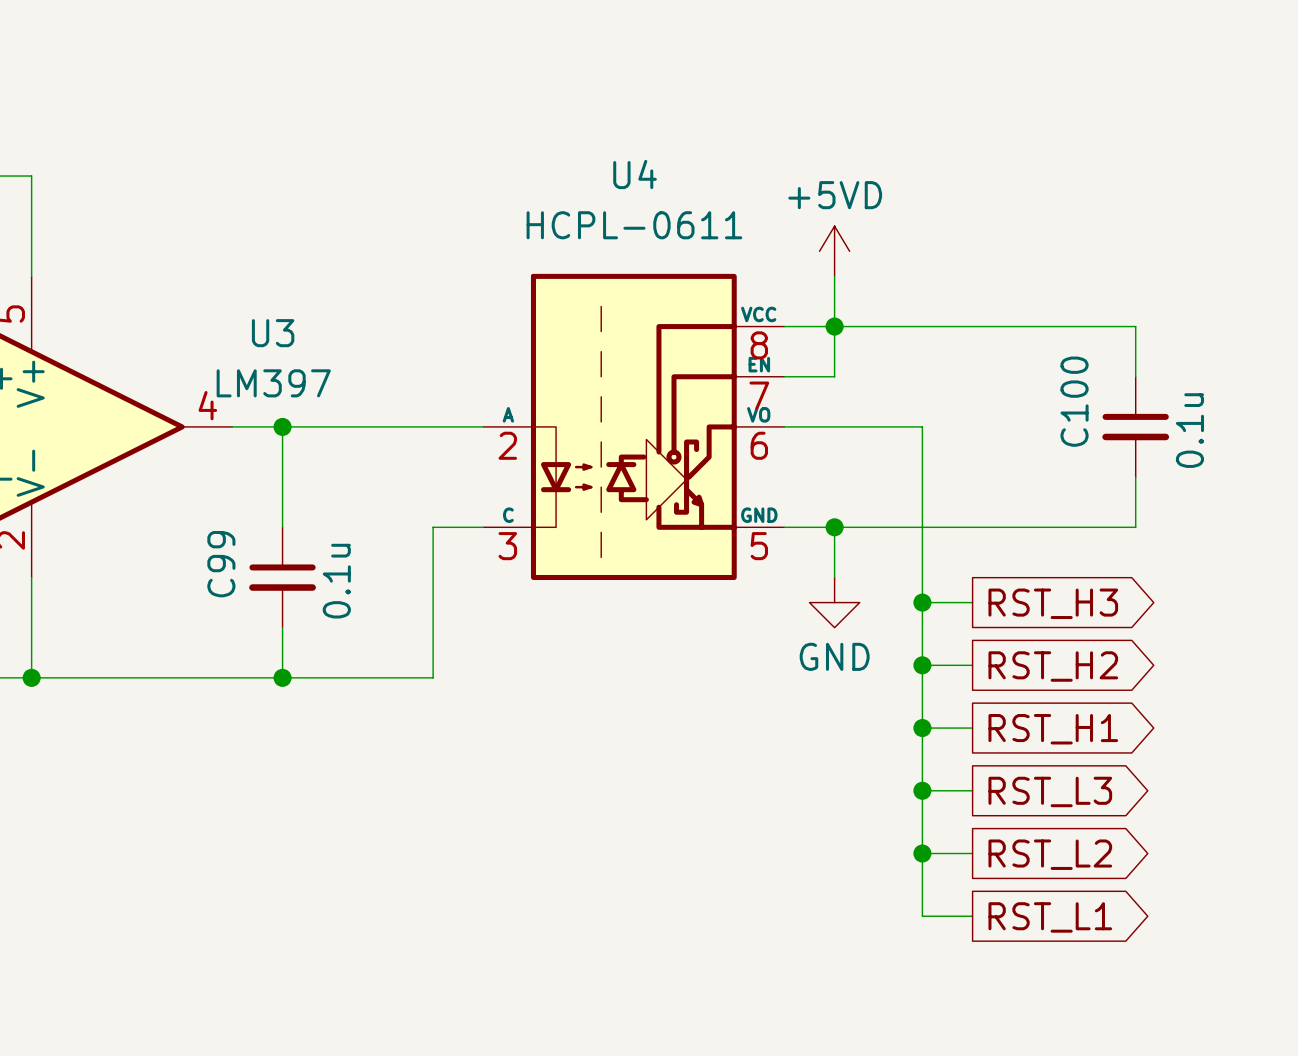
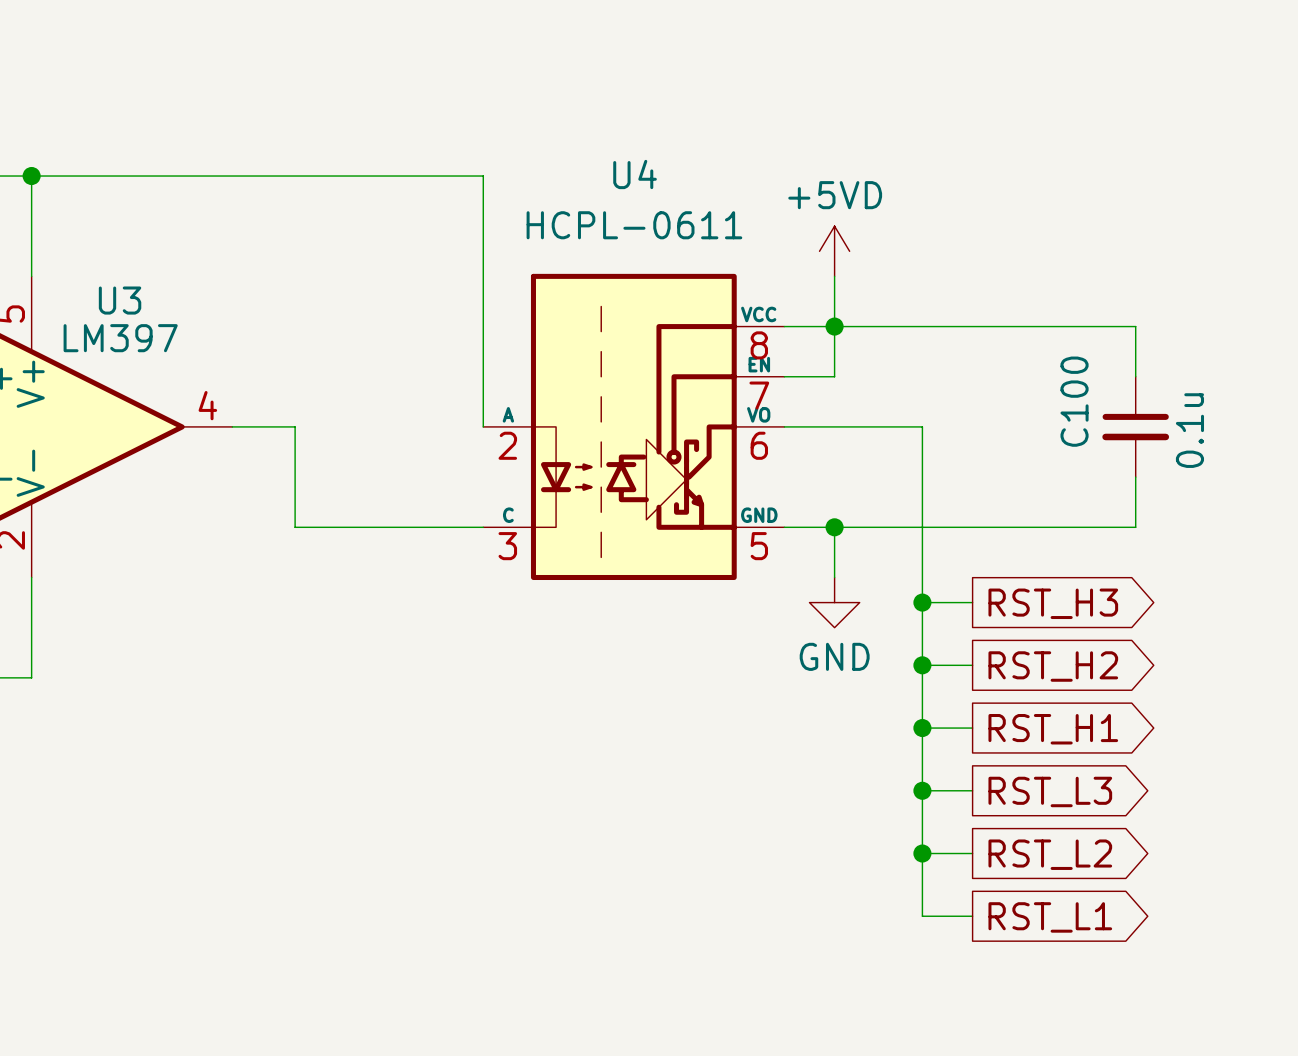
wire: none -> (31, 176) (483, 176) (483, 426)
junction: none -> (31, 176)
U3 name position: U3 (273, 333) -> U3 (120, 300)
U3 value position: LM397 (273, 383) -> LM397 (120, 338)
wire: (282, 426) (282, 527) -> none
junction: (282, 426) -> none
wire: (295, 426) (483, 426) -> (295, 426) (295, 527) (433, 527)
wire: (433, 527) (433, 677) (31, 677) -> none
C99: 0.1u (282, 577) -> none
wire: (282, 627) (282, 677) -> none
junction: (31, 677) -> none
junction: (282, 677) -> none

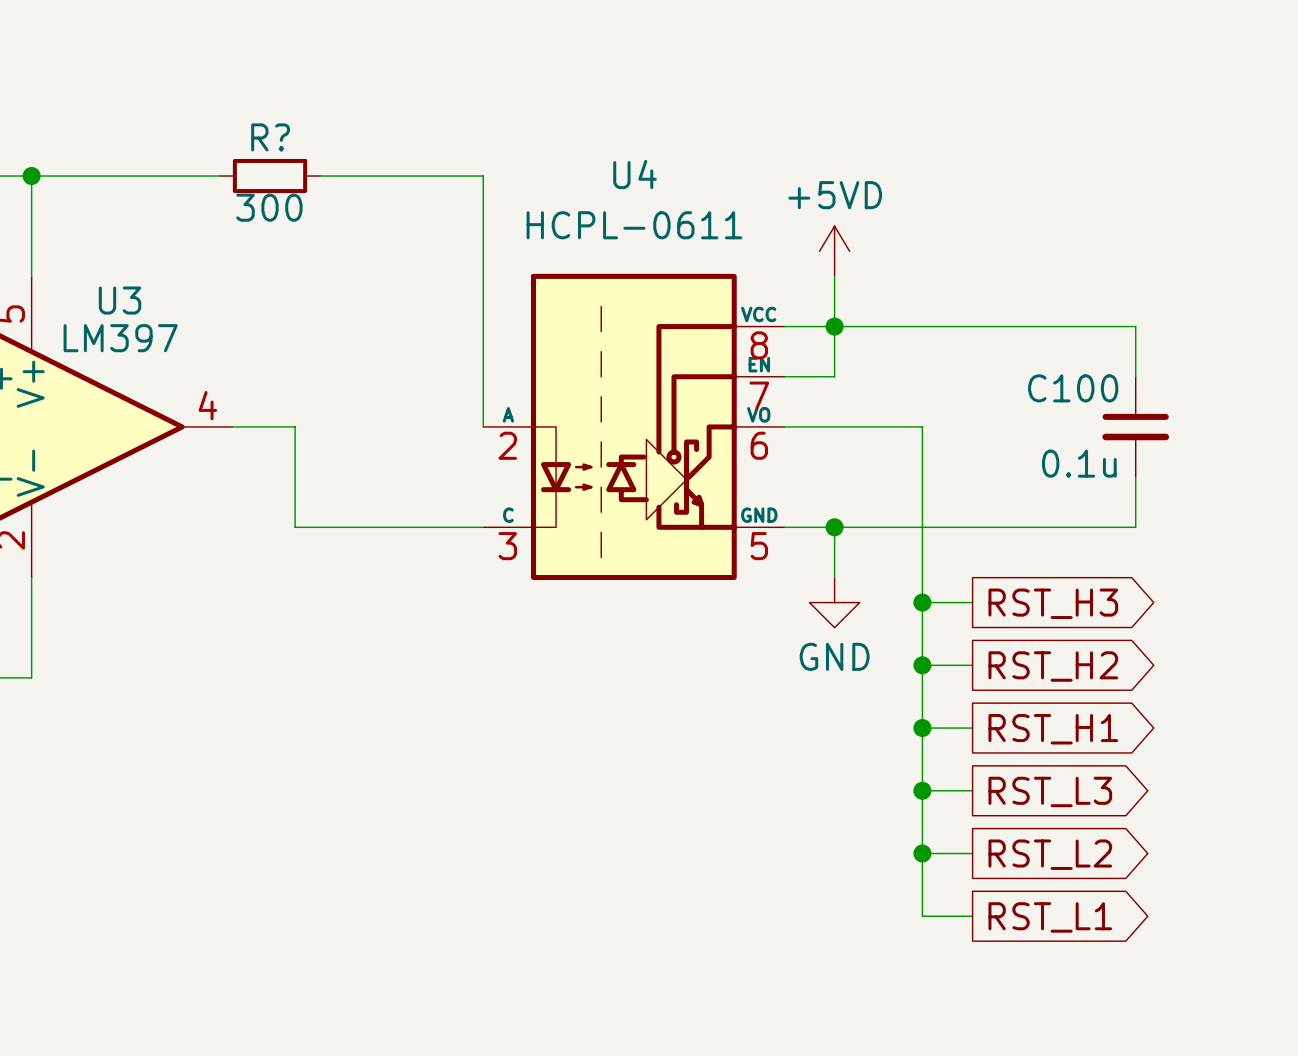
wire: (219, 176) (320, 176) -> none
R?: none -> 300 (270, 176)
C100 name rotation: 0° (1074, 401) -> 90° clockwise (1073, 388)
C100 value rotation: 0° (1189, 430) -> 90° clockwise (1079, 463)
C100 value position: 0.1u (1189, 430) -> 0.1u (1079, 463)

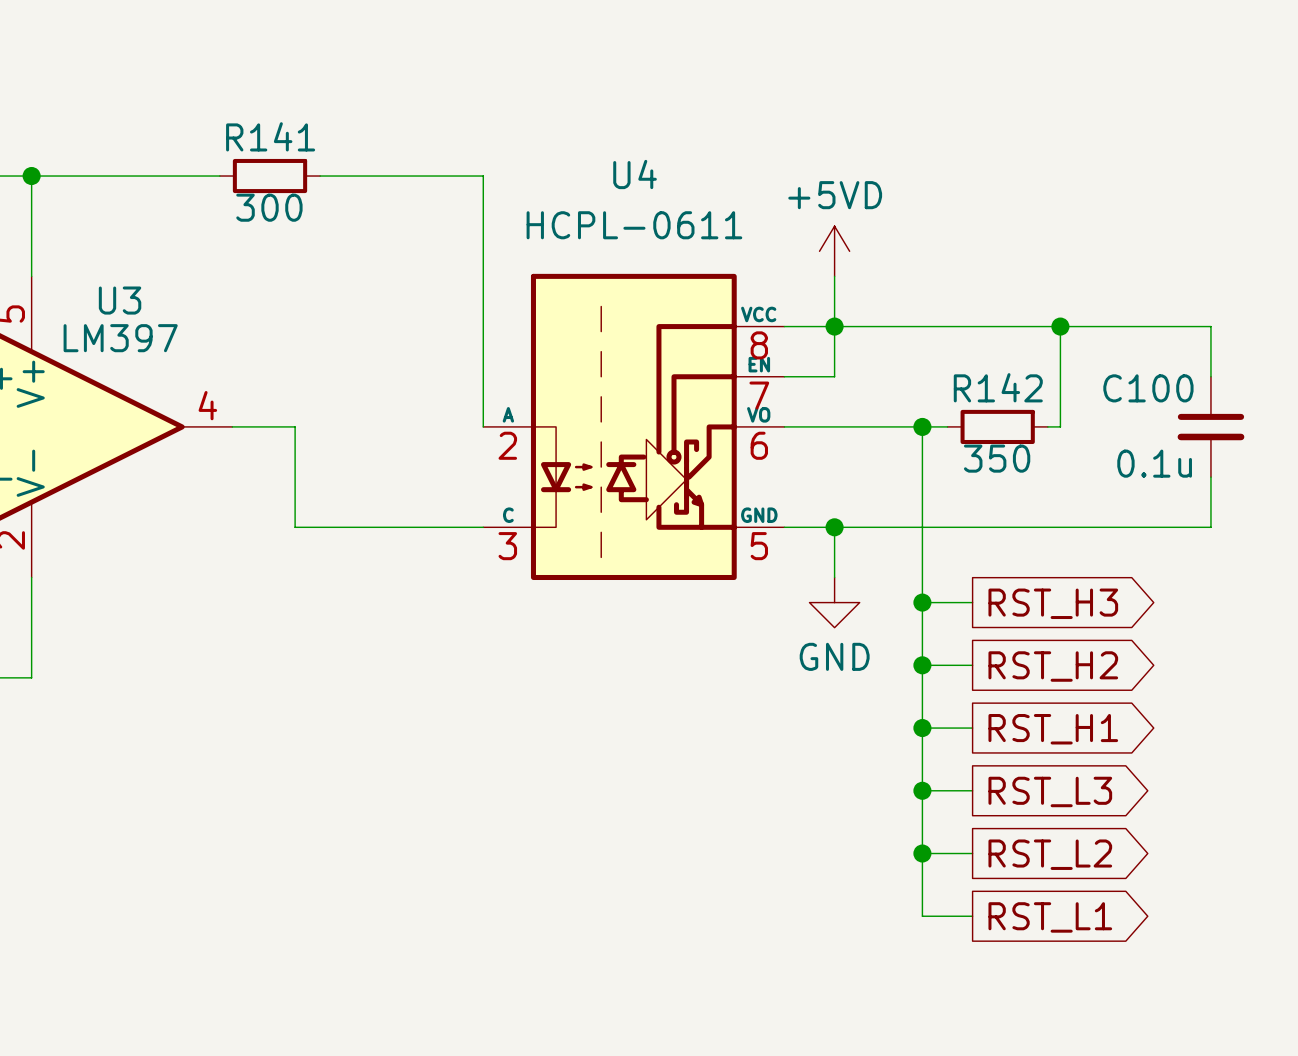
R? name: R? (270, 137) -> R141 (270, 136)
wire: none -> (1060, 326) (1060, 426) (1047, 426)
junction: none -> (1060, 326)
wire: (1135, 326) (1135, 376) -> (1135, 326) (1210, 326) (1210, 376)
wire: none -> (922, 426) (947, 426)
junction: none -> (922, 426)
R142: none -> 350 (997, 426)
C100 position: (1135, 426) -> (1210, 426)
wire: (1135, 477) (1135, 527) -> (1210, 477) (1210, 527) (1135, 527)

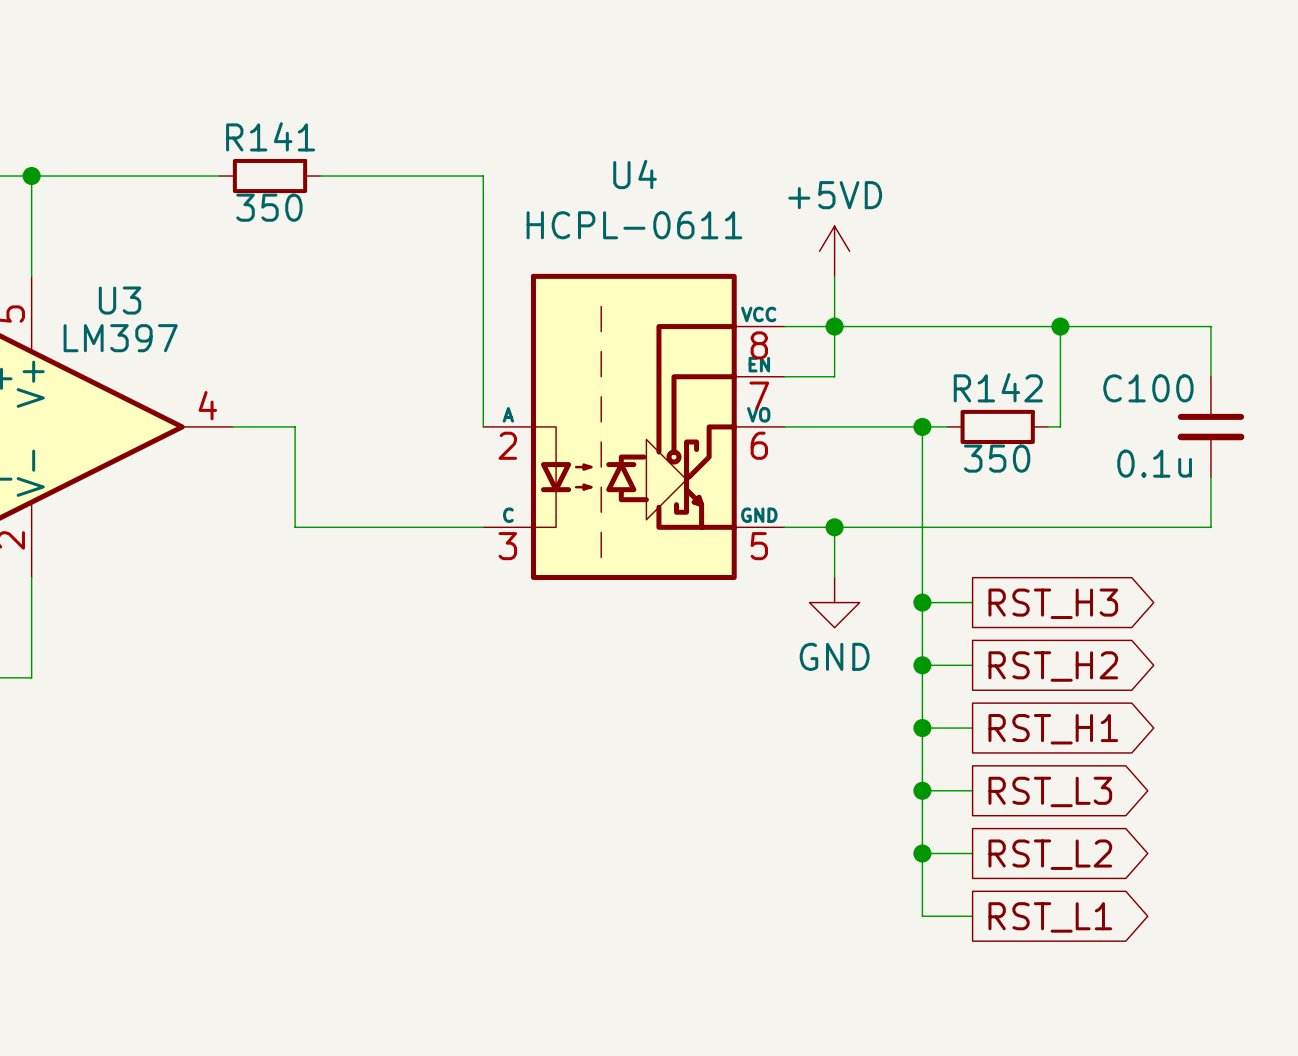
R141 value: 300 (269, 207) -> 350 (269, 207)

